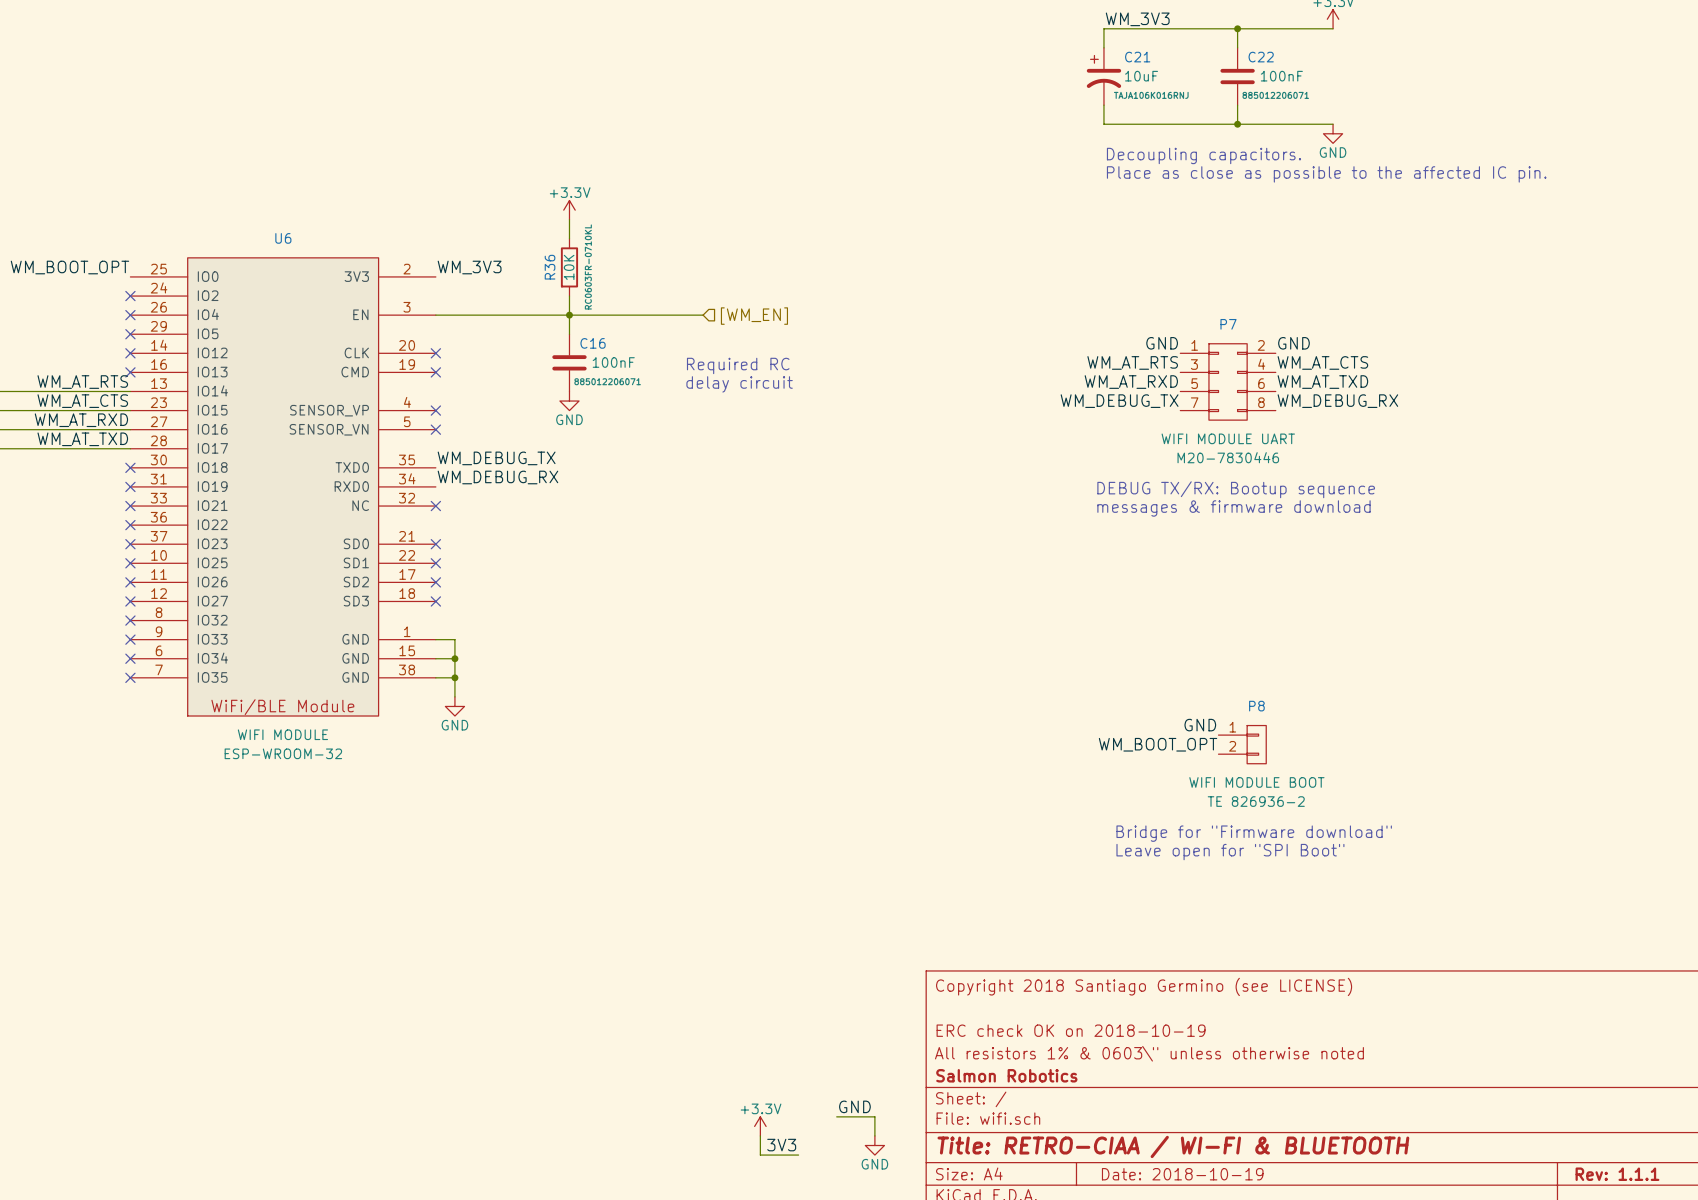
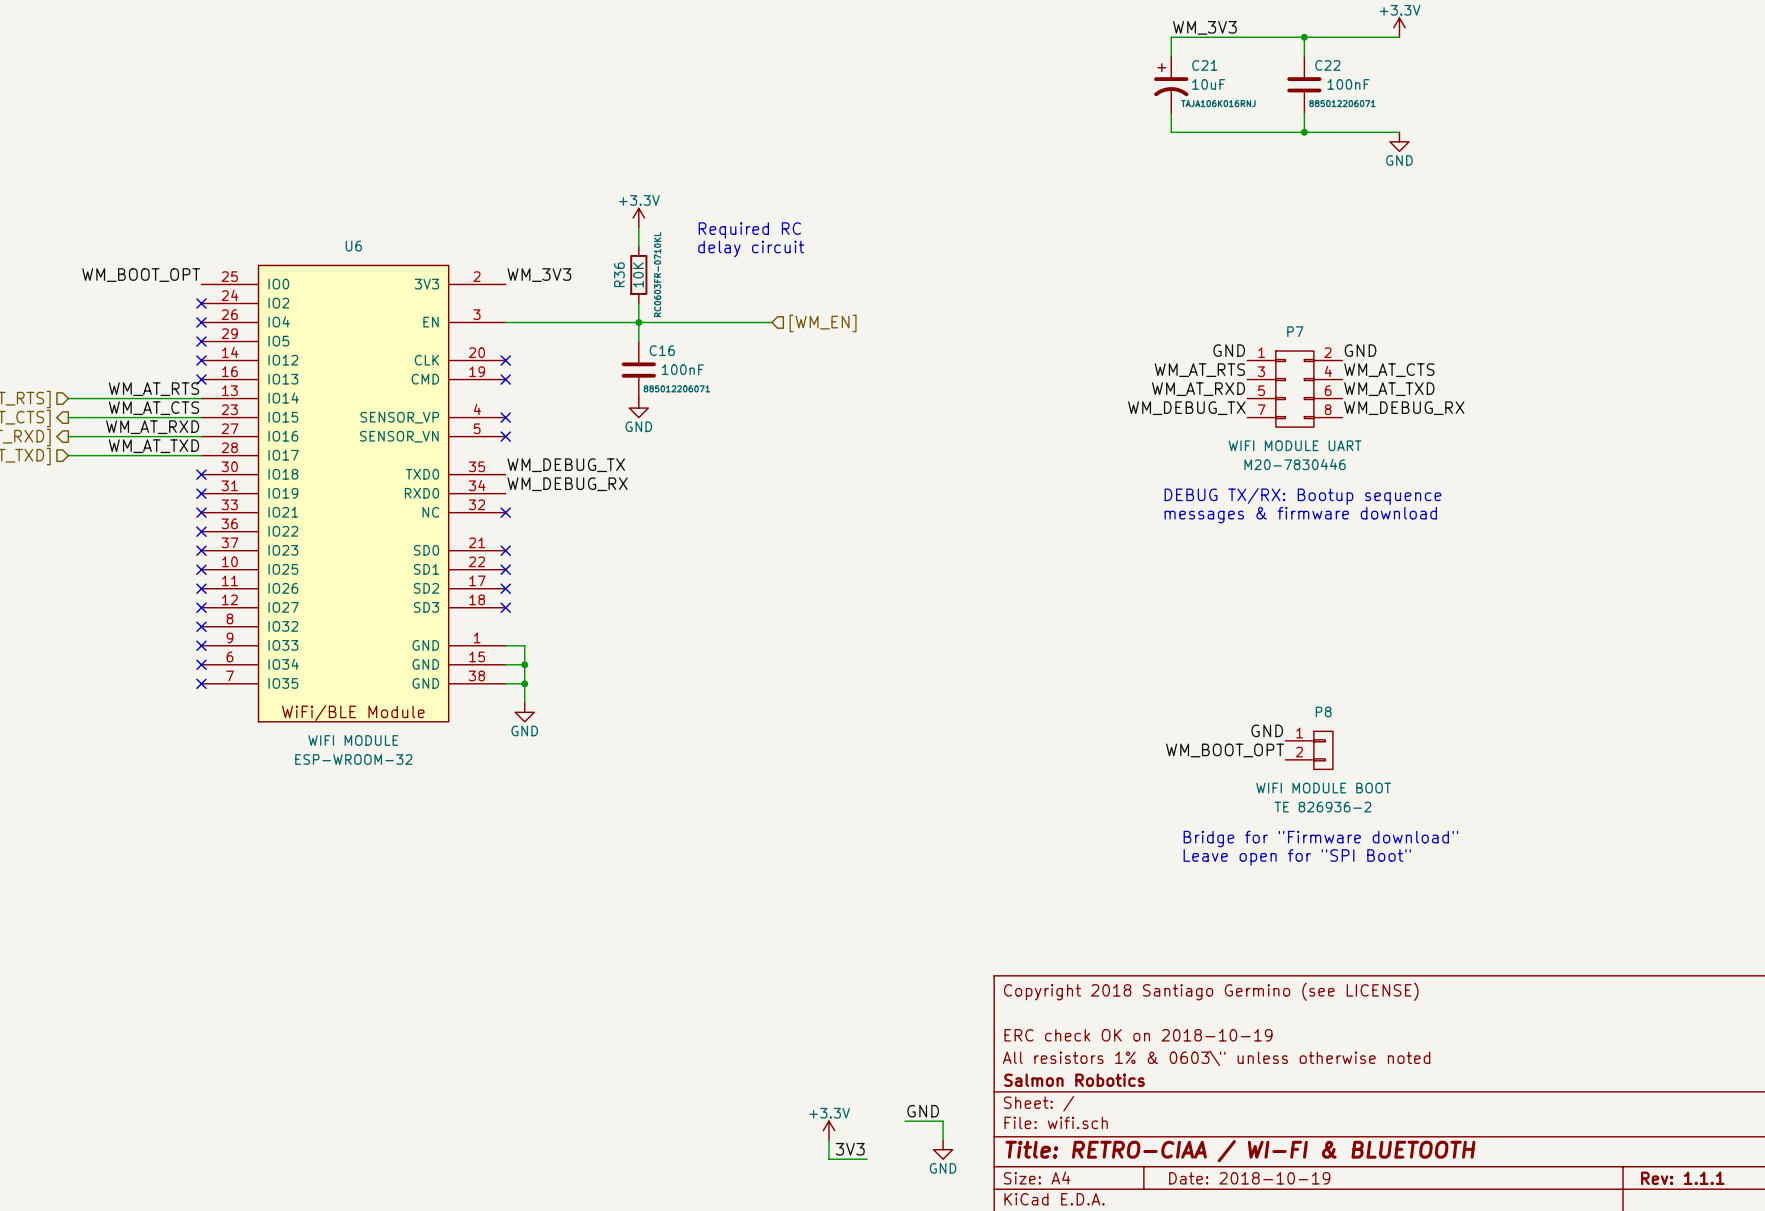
text: Decoupling capacitors. (1203, 155) -> none
text: Place as close as possible to the affected IC pin. (1326, 174) -> none
text position: Required RC (738, 365) -> Required RC (749, 230)
text position: delay circuit (739, 384) -> delay circuit (751, 248)

